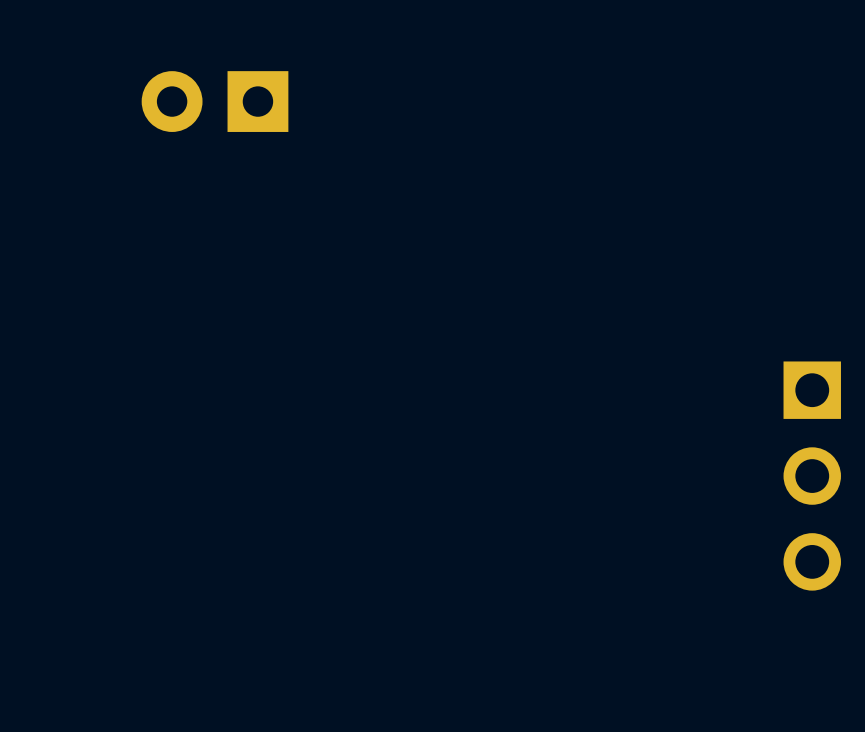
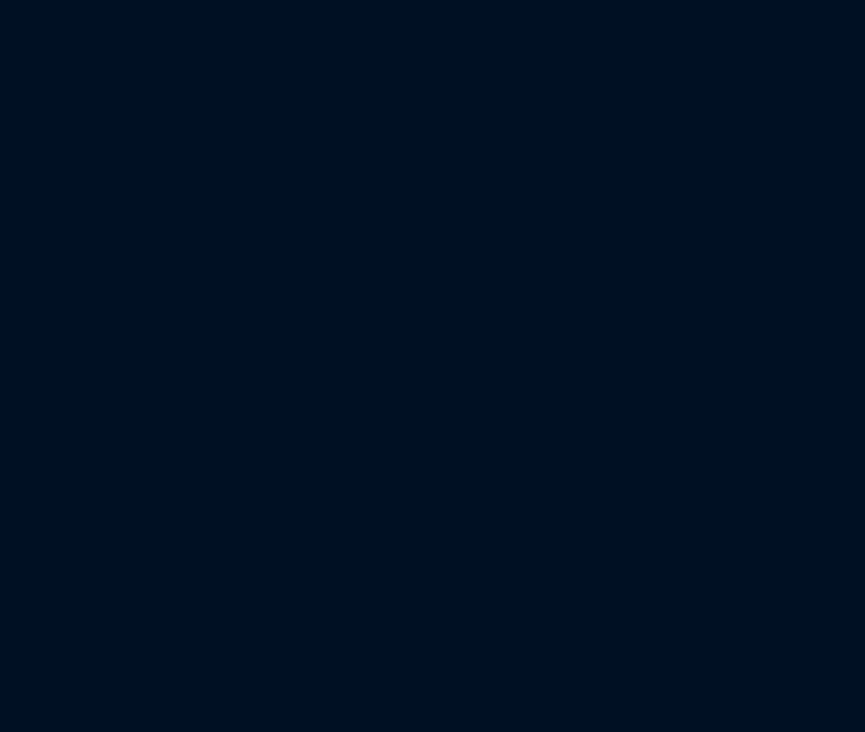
part: (215, 101) -> none
part: (812, 476) -> none

